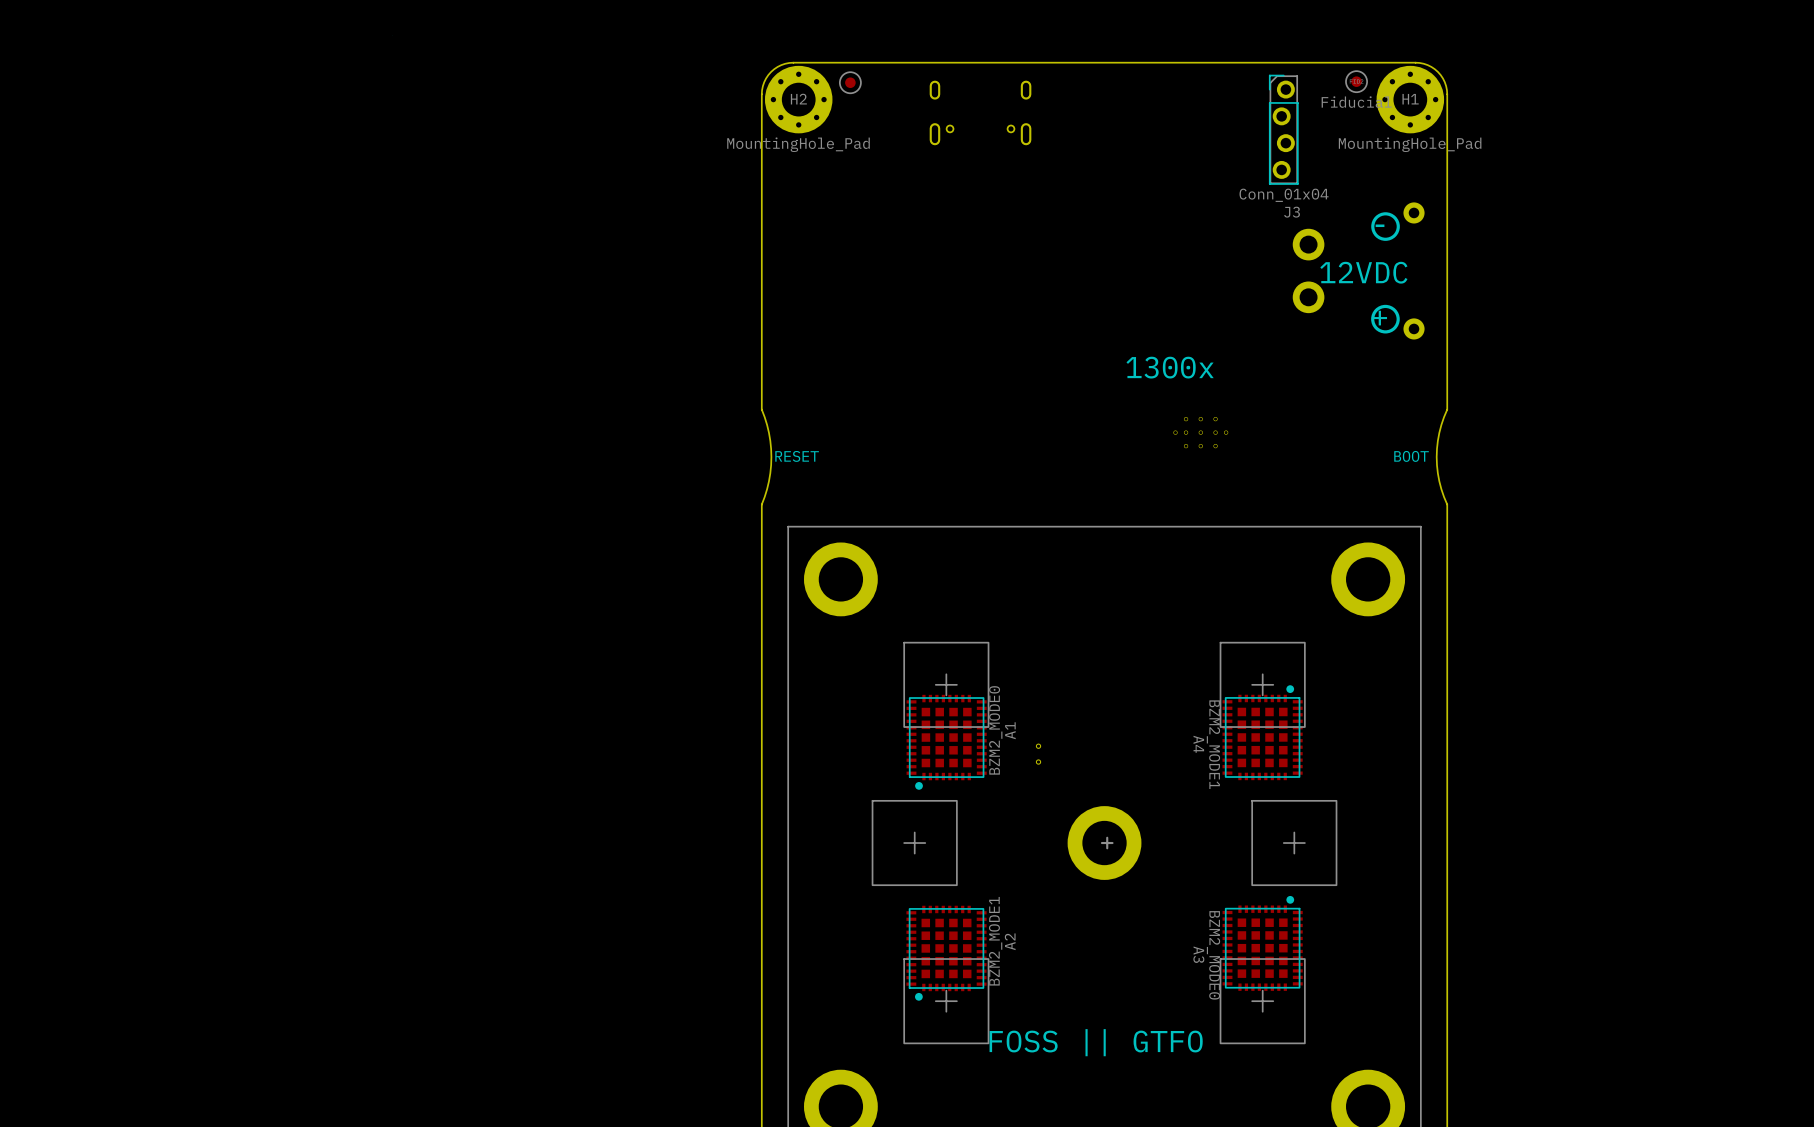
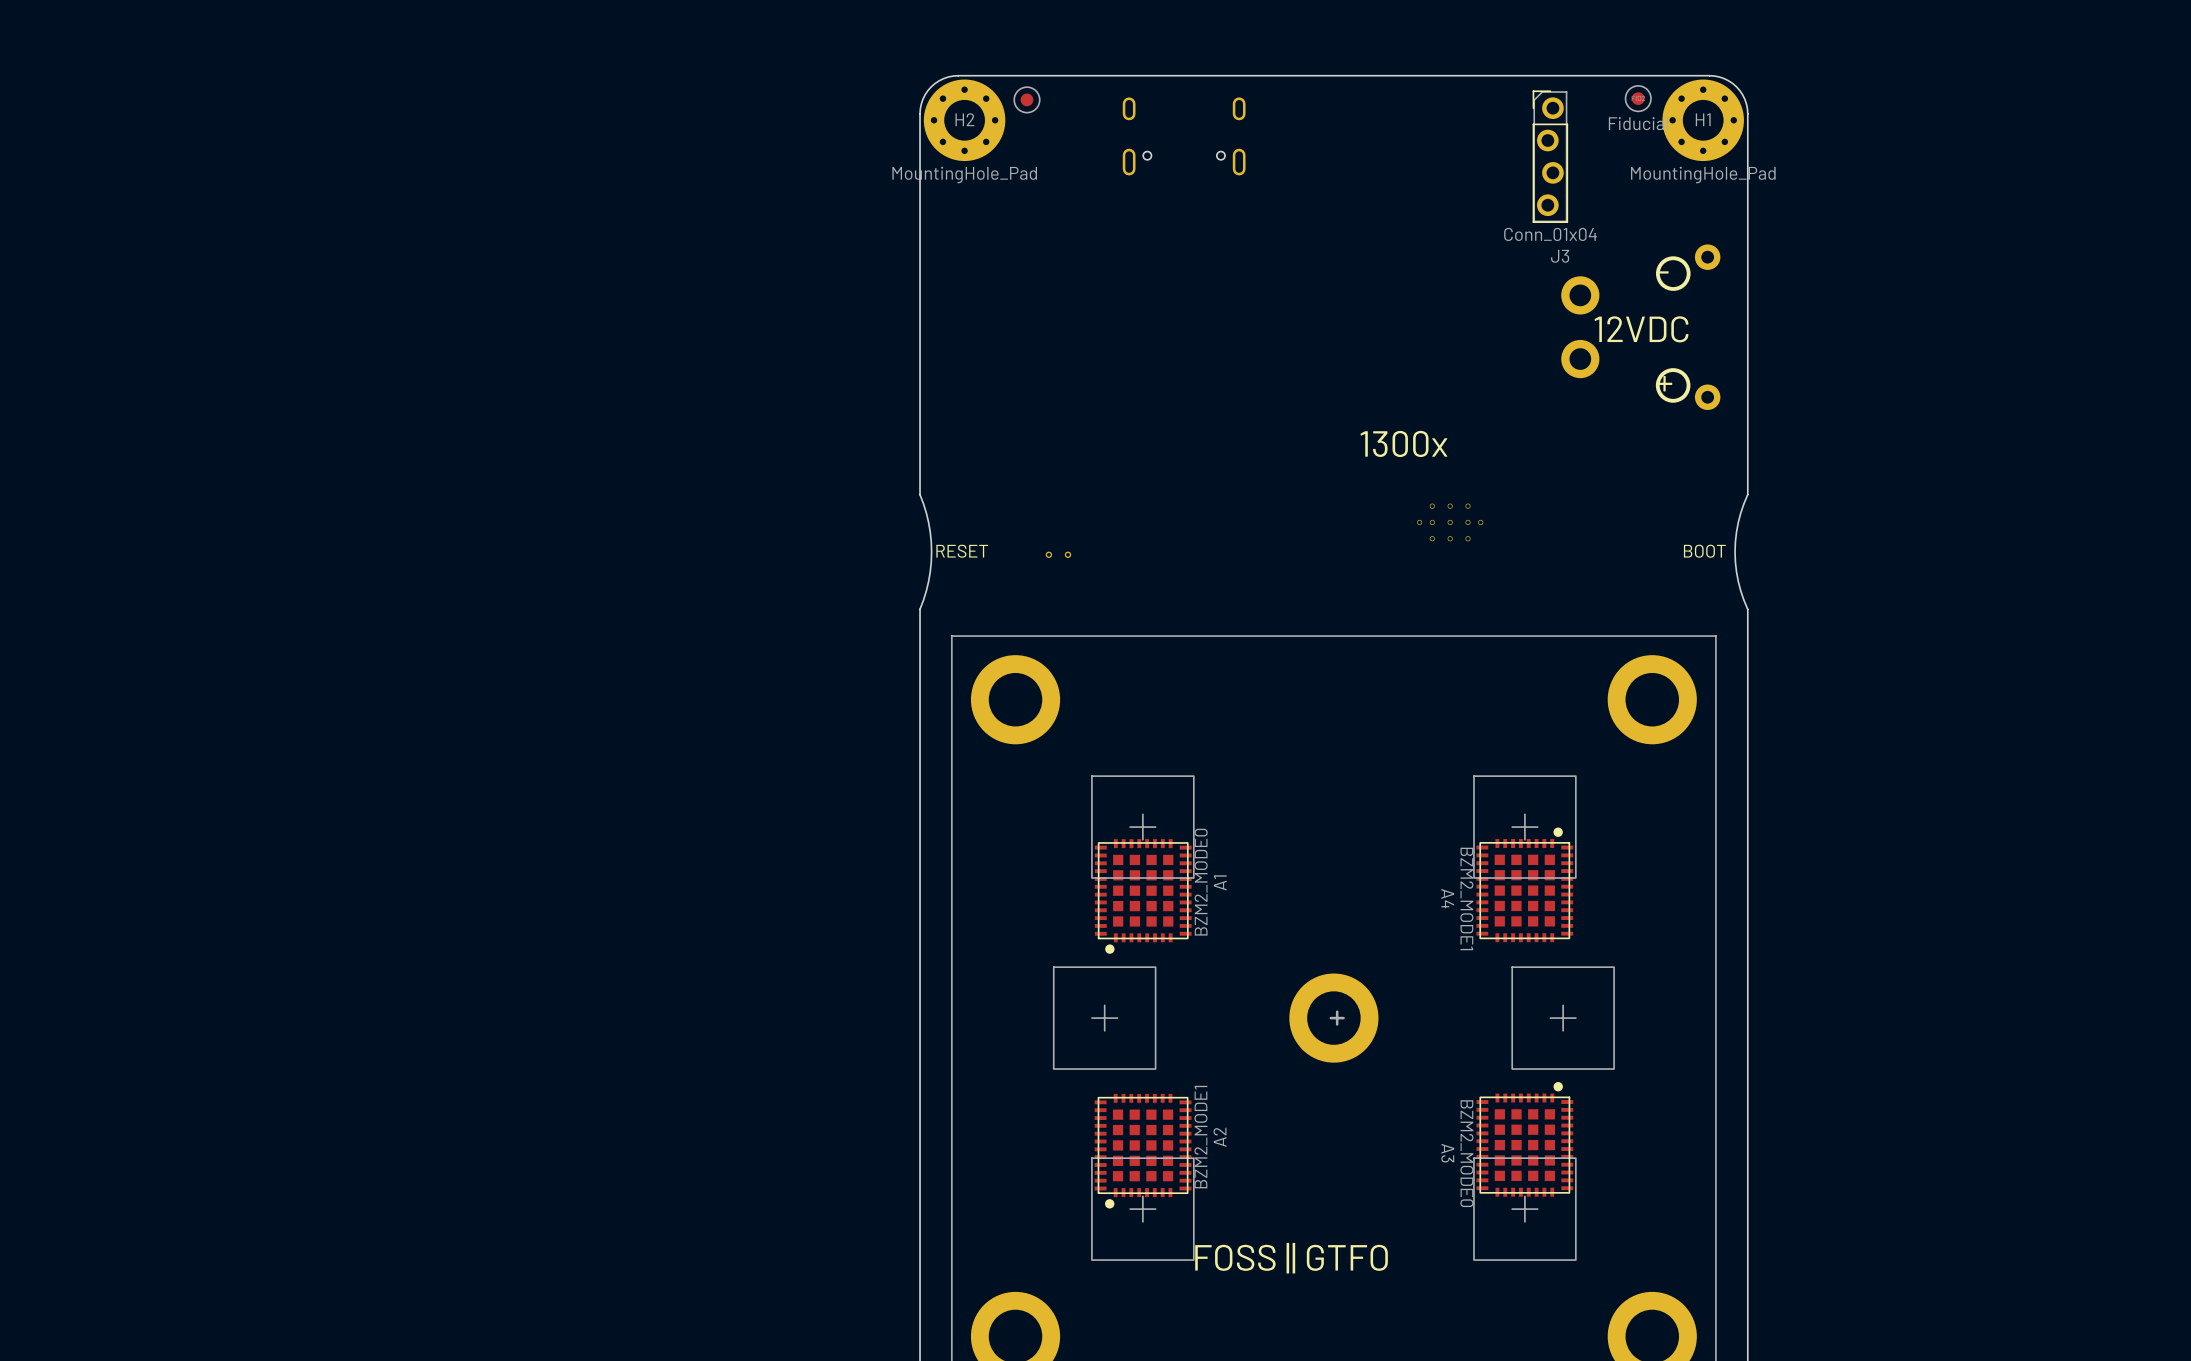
part: none -> (1058, 554)
part: (1038, 754) -> none

